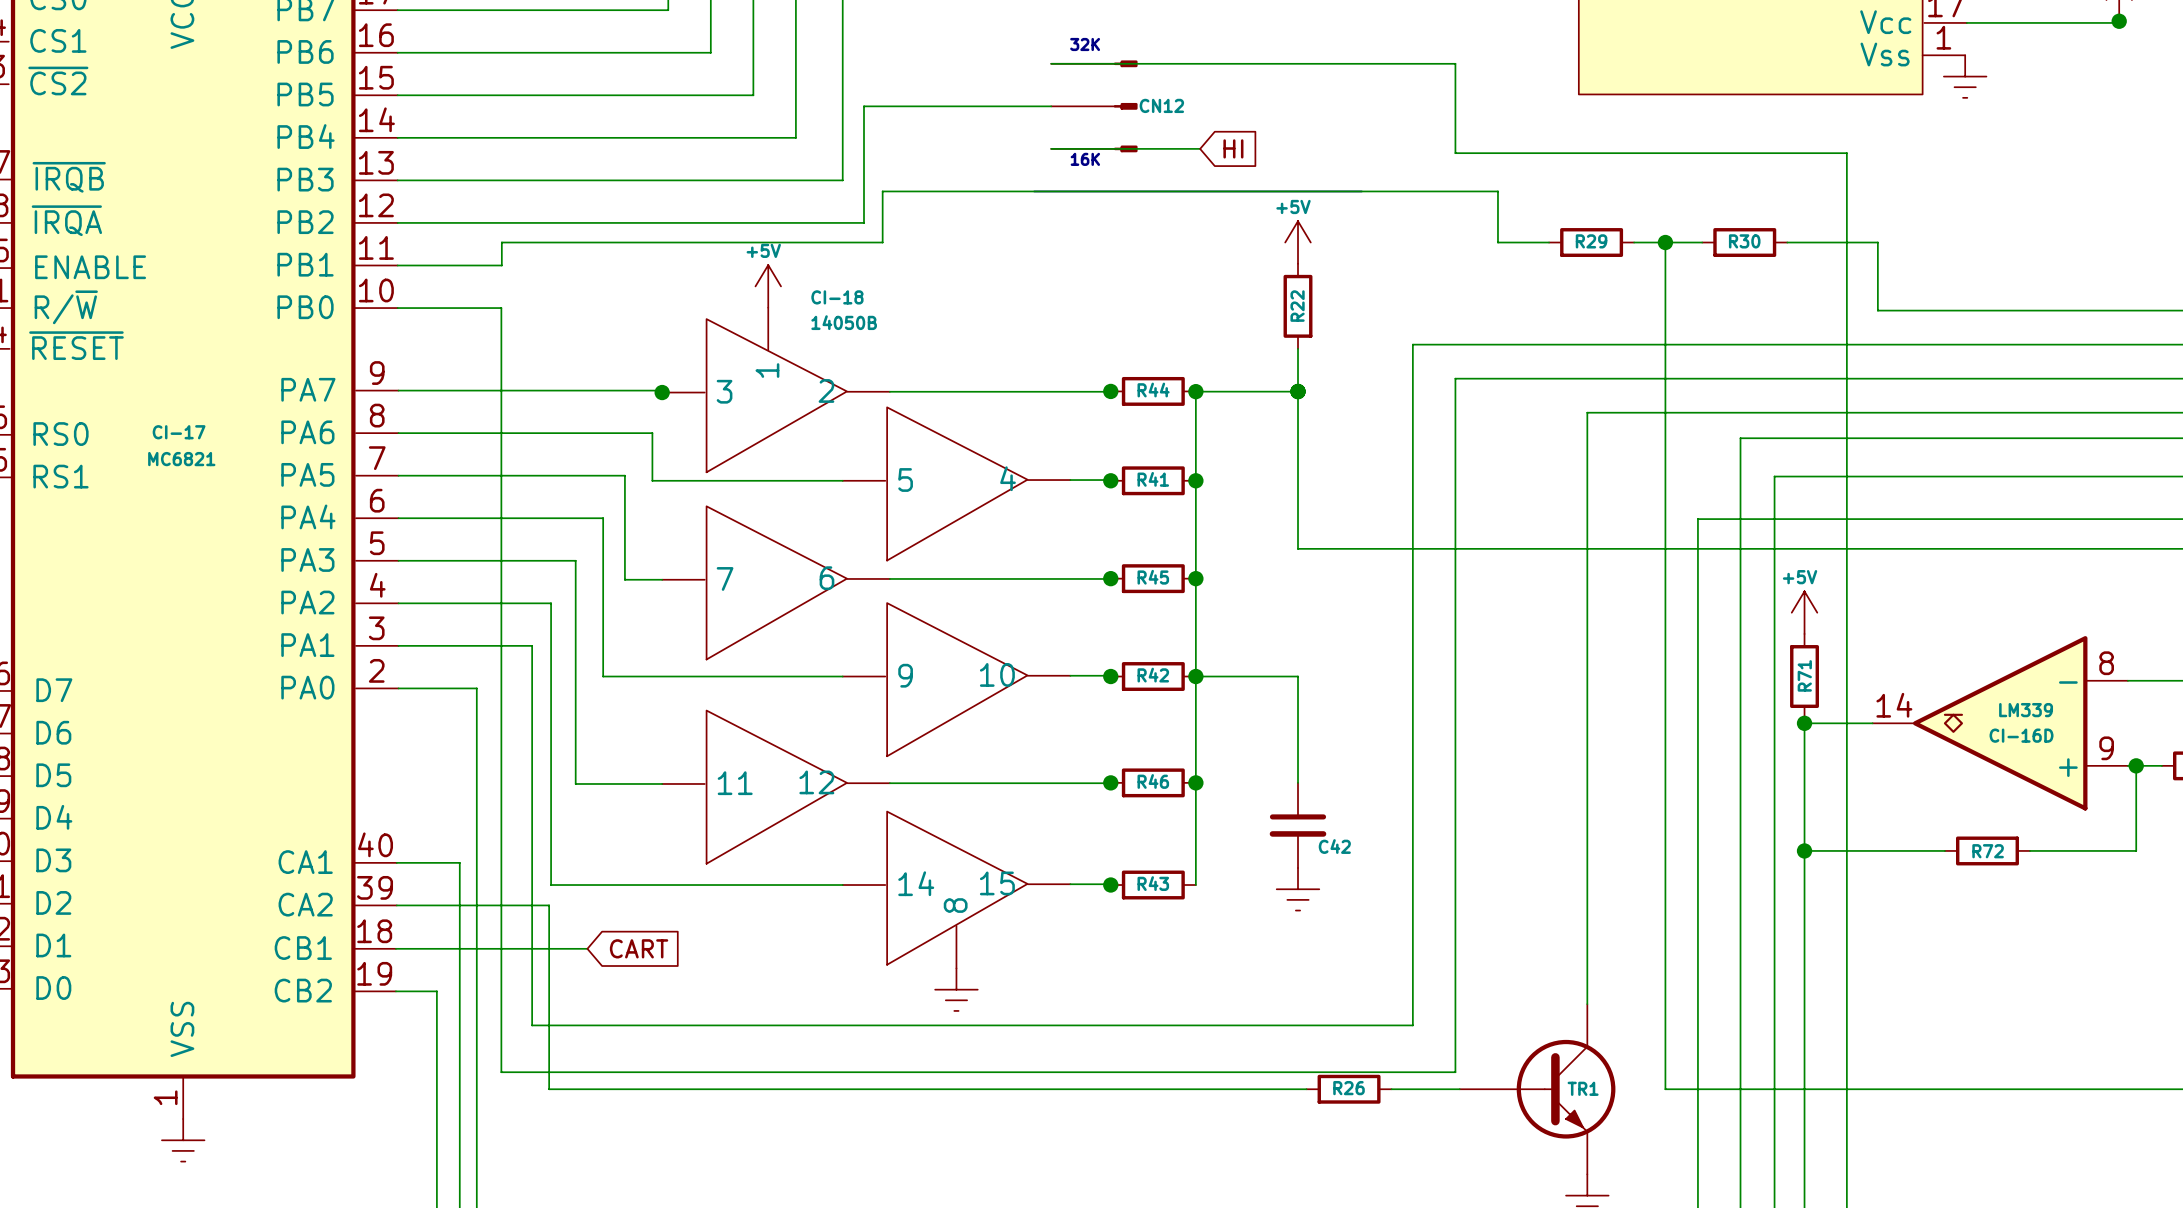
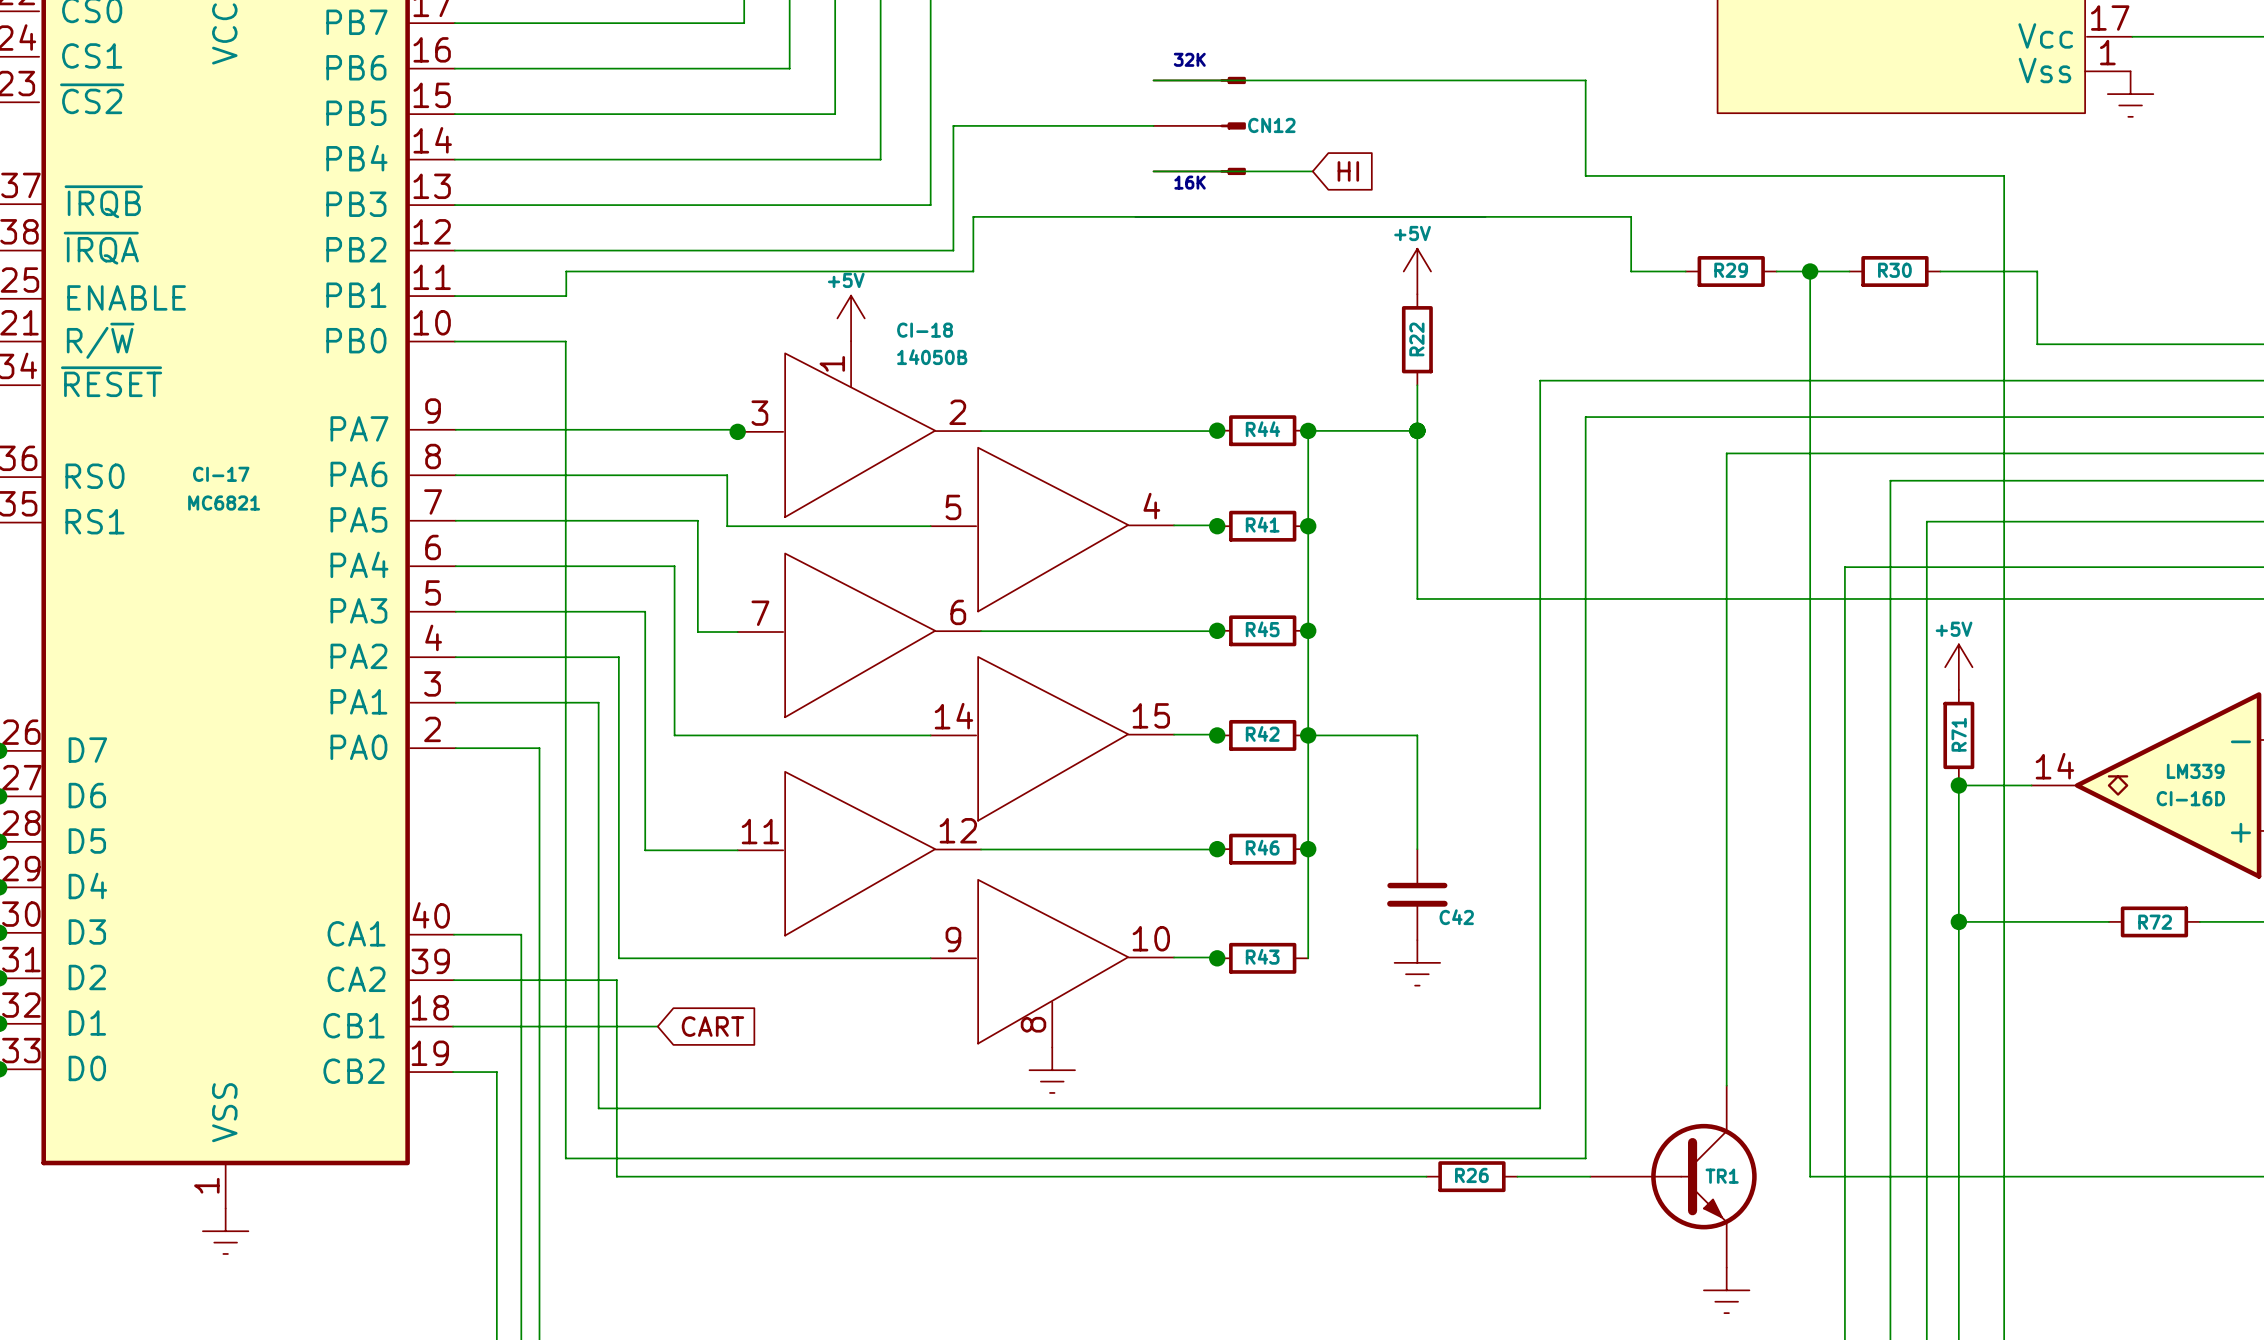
CI-18 symbol: [662, 307, 1071, 969] -> [737, 341, 1175, 1048]

